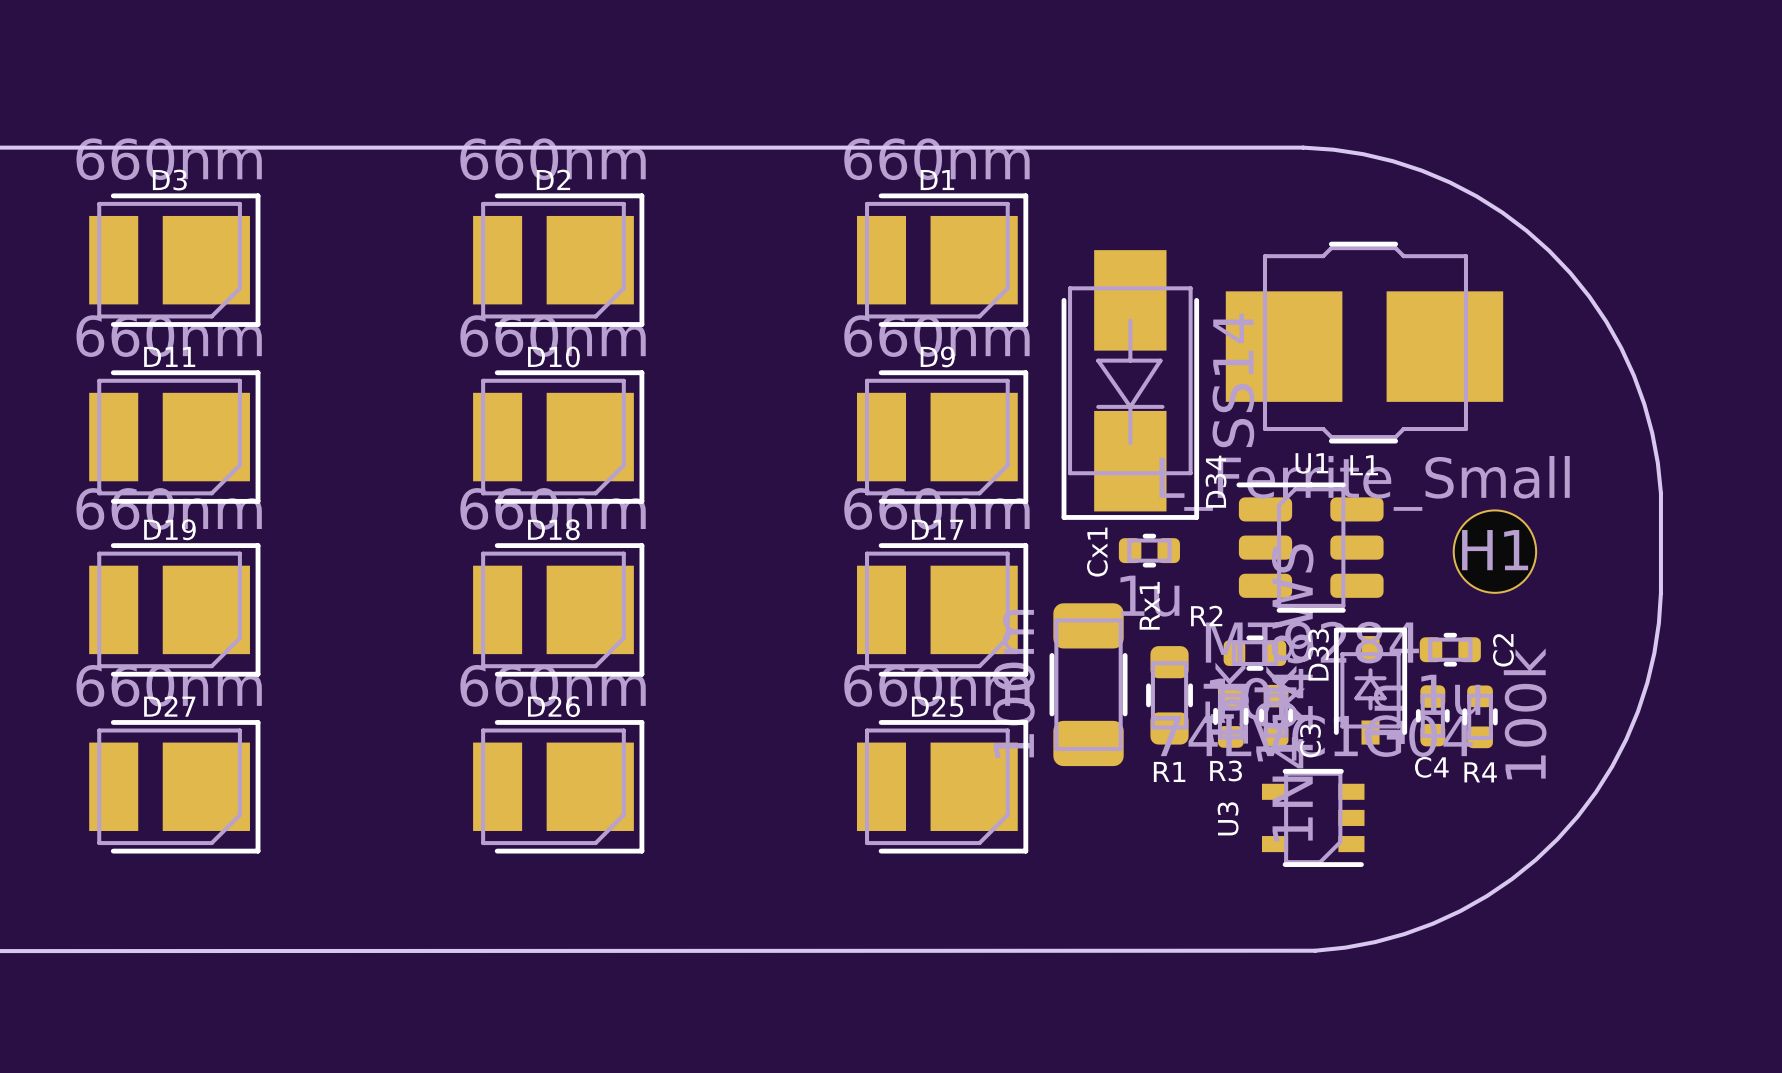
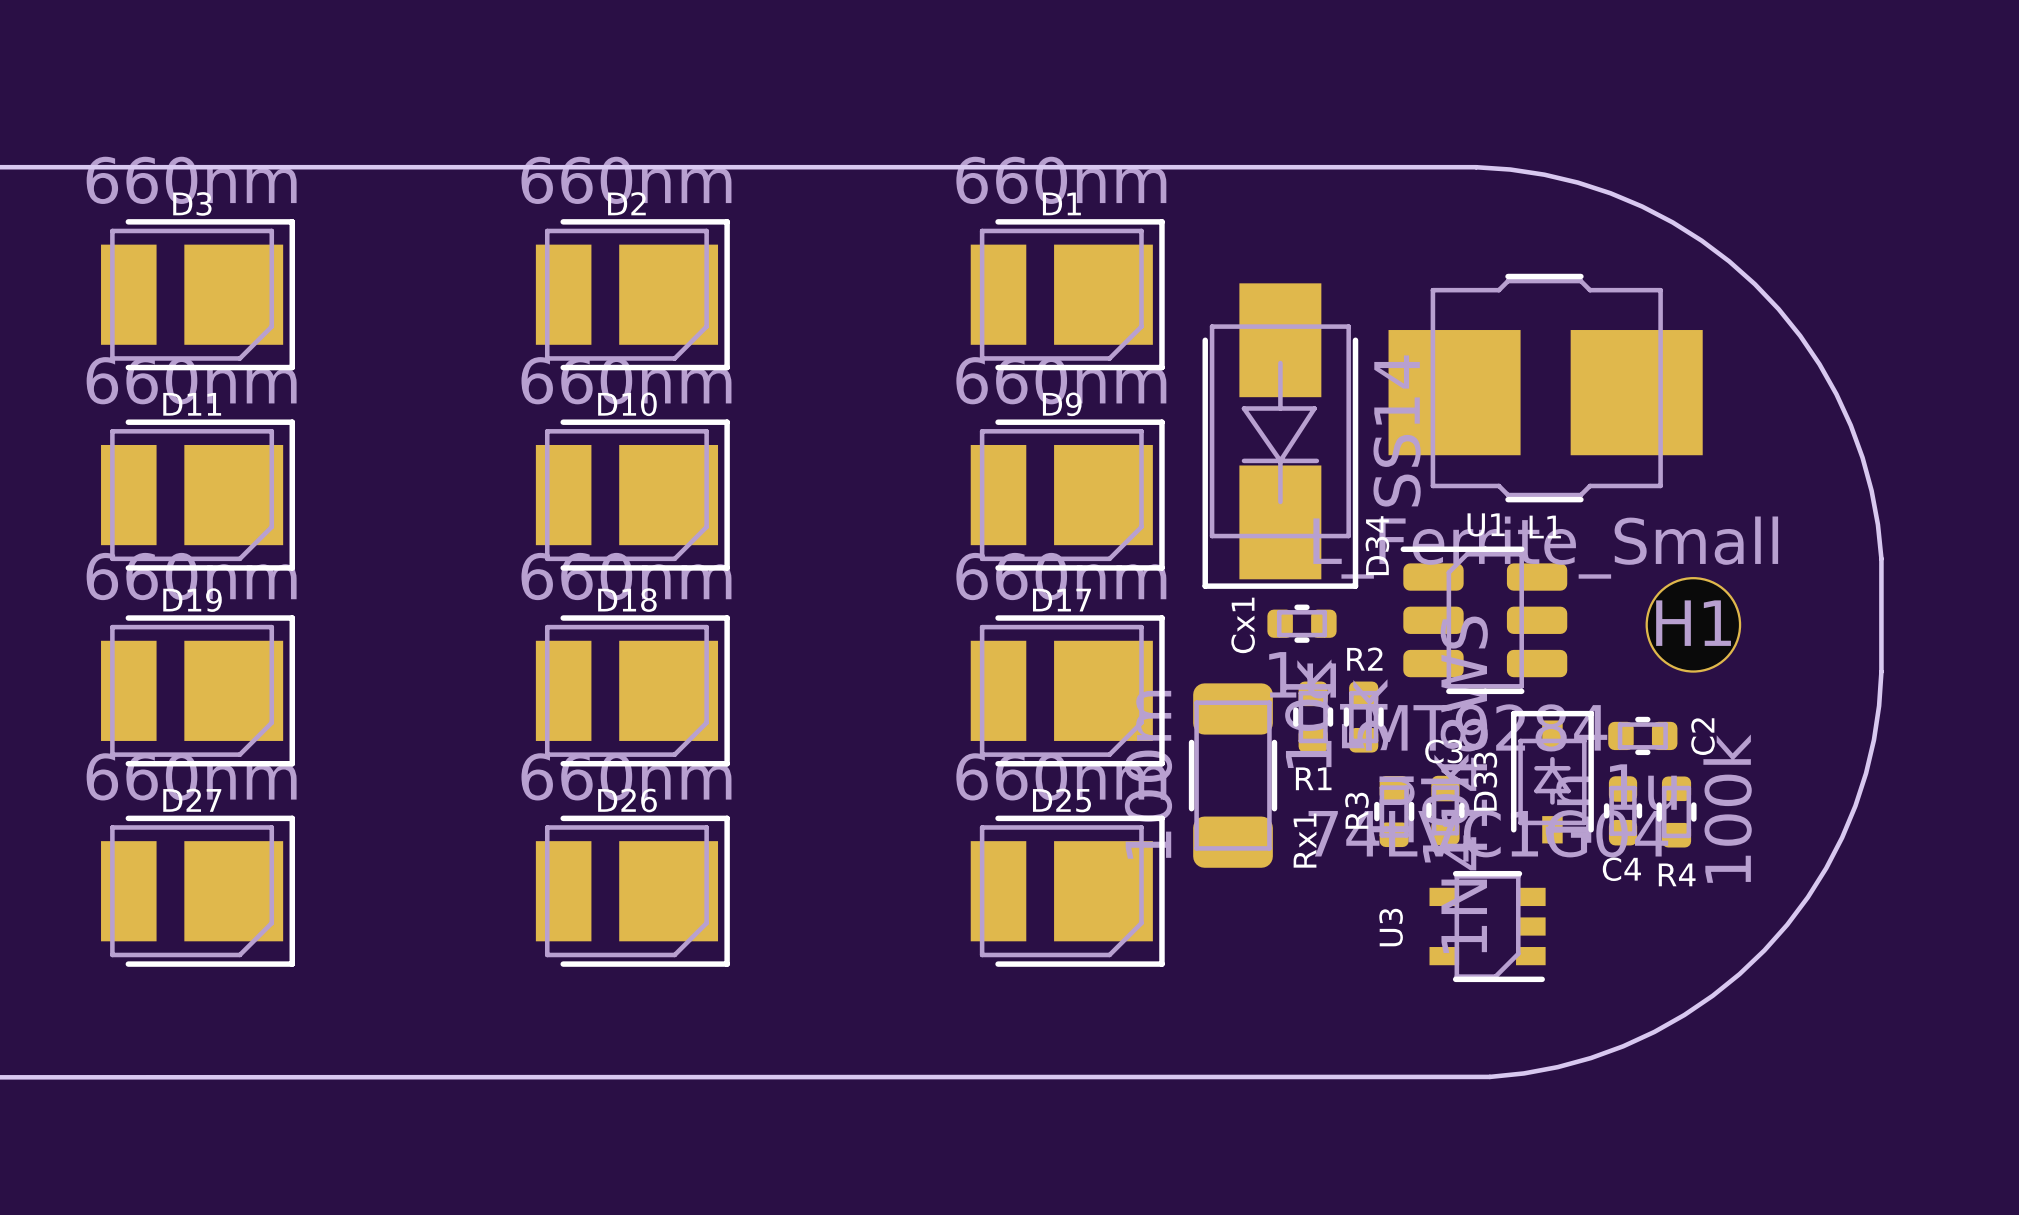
Rx1 name position: Rx1 (1149, 605) -> Rx1 (1305, 840)
R1 footprint: [1146, 646, 1193, 745] -> [1293, 681, 1334, 753]
R2 rotation: 0° (1254, 653) -> 90° clockwise (1363, 717)
R2 position: (1254, 653) -> (1363, 717)
D33 name position: D33 (1318, 654) -> D33 (1485, 781)
C3 name rotation: 0° (1310, 740) -> 90° clockwise (1443, 751)
C3 name position: C3 (1310, 740) -> C3 (1443, 751)
R3 name rotation: 0° (1226, 770) -> 90° counterclockwise (1356, 810)
R3 name position: R3 (1226, 770) -> R3 (1356, 810)

